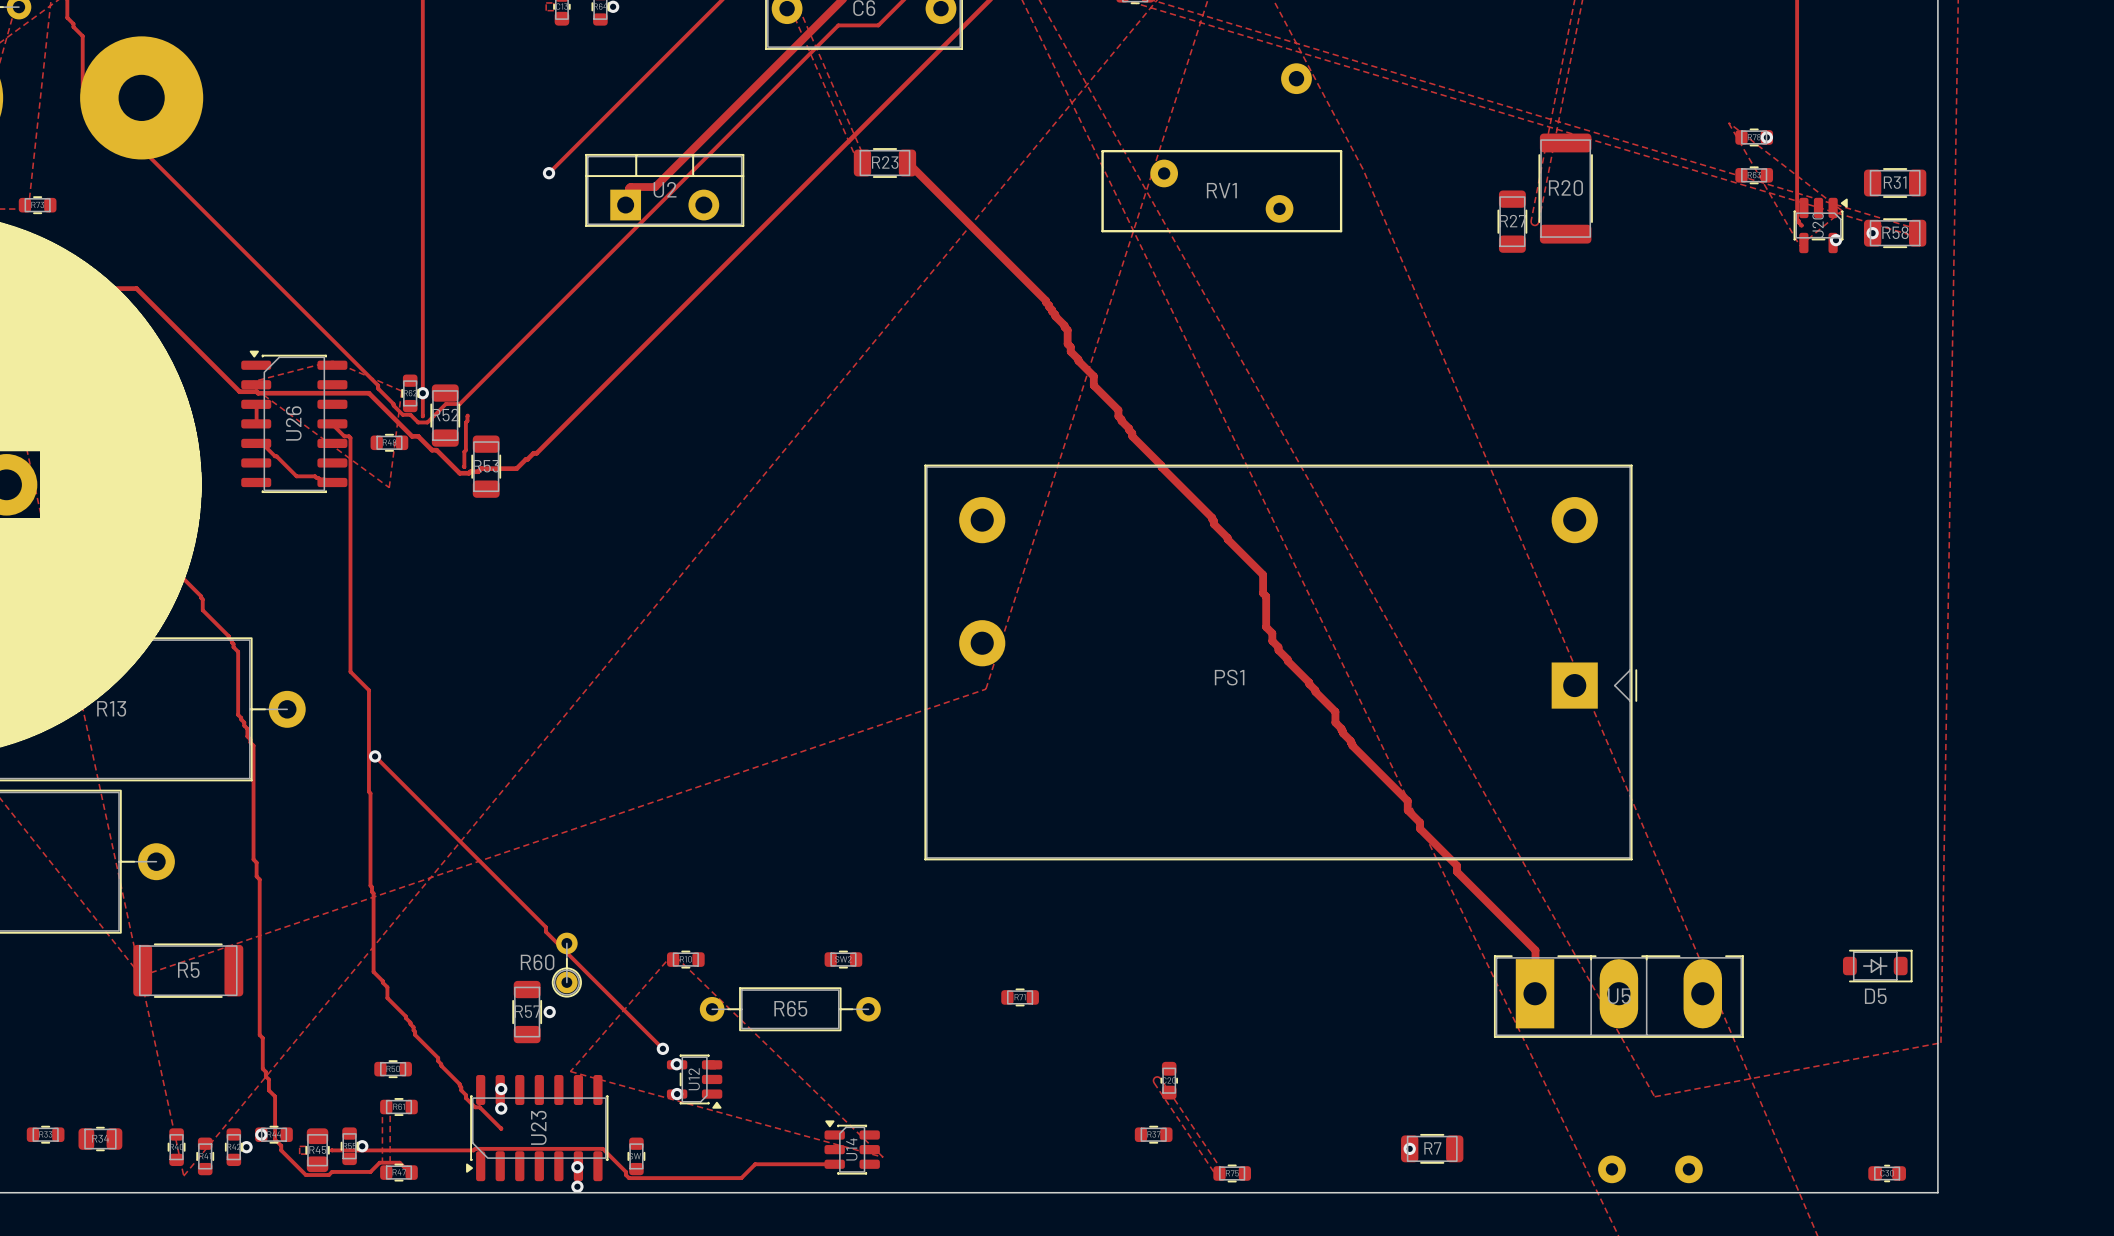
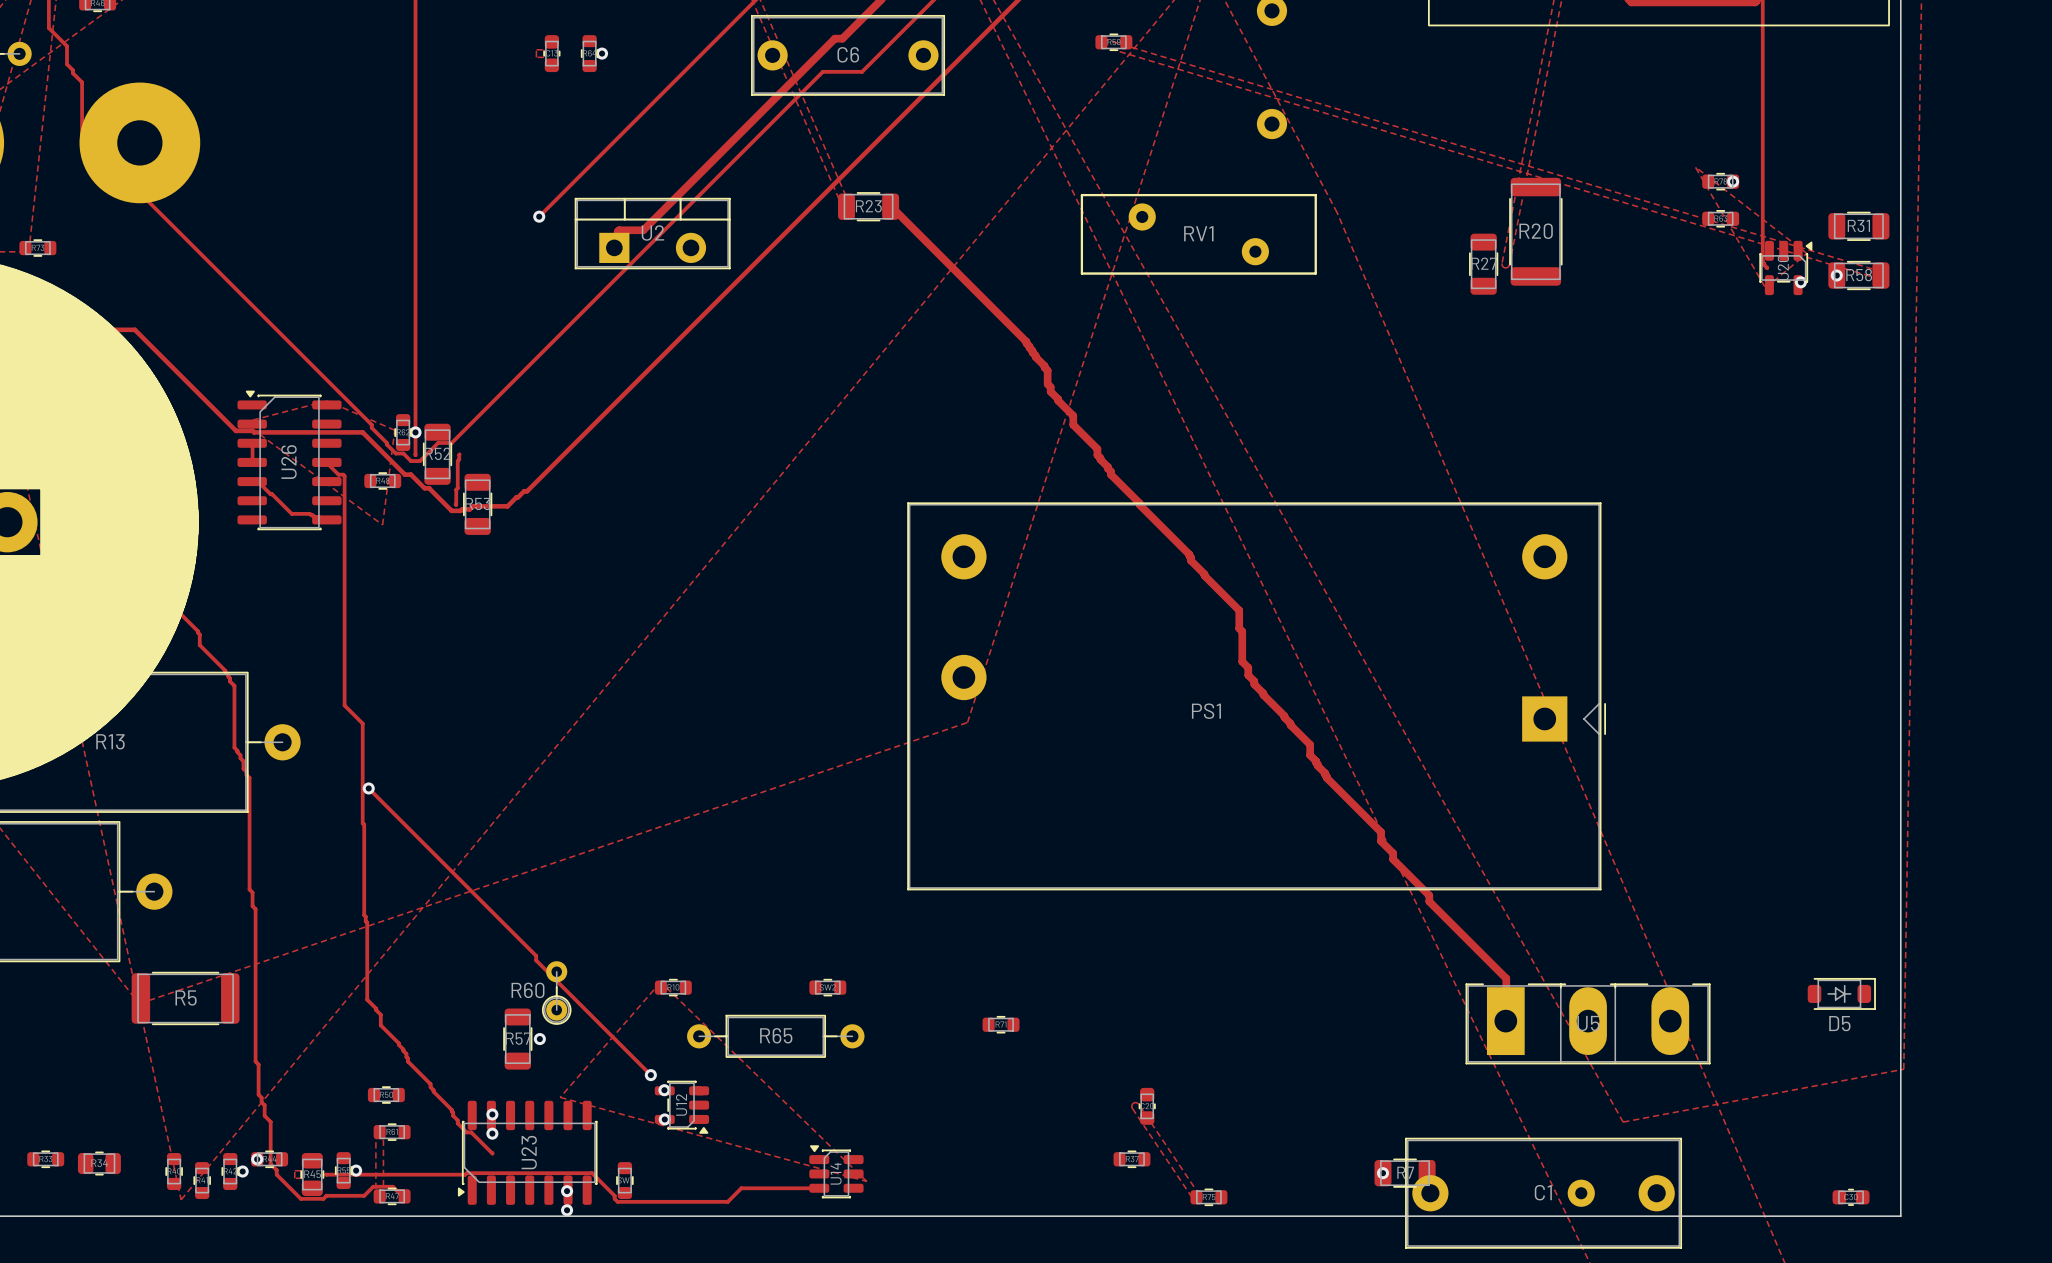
C1: none -> (1543, 1193)

